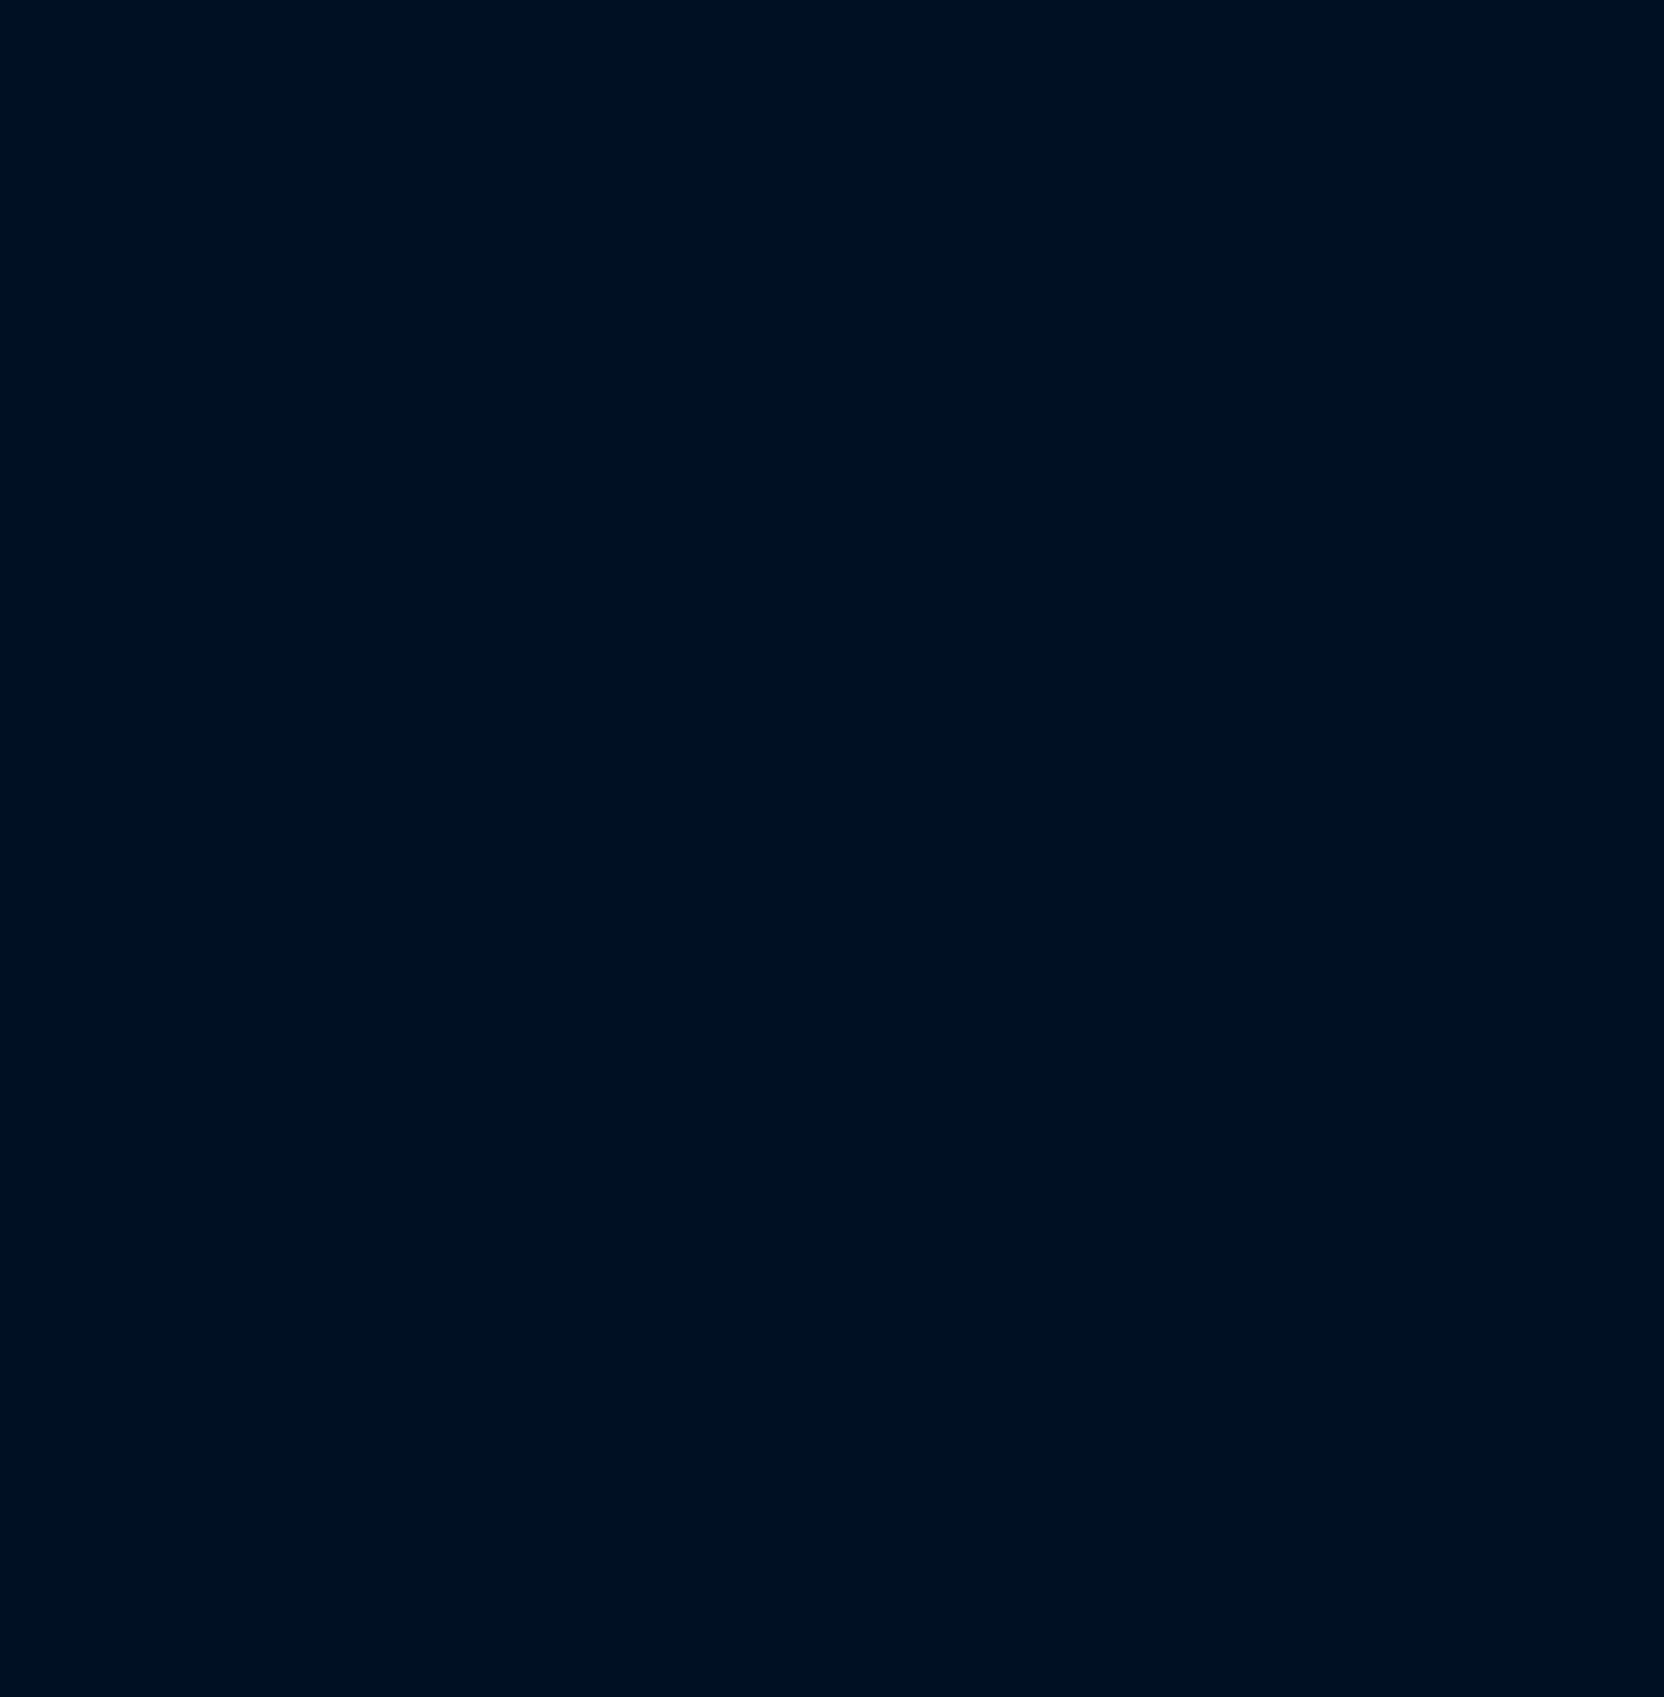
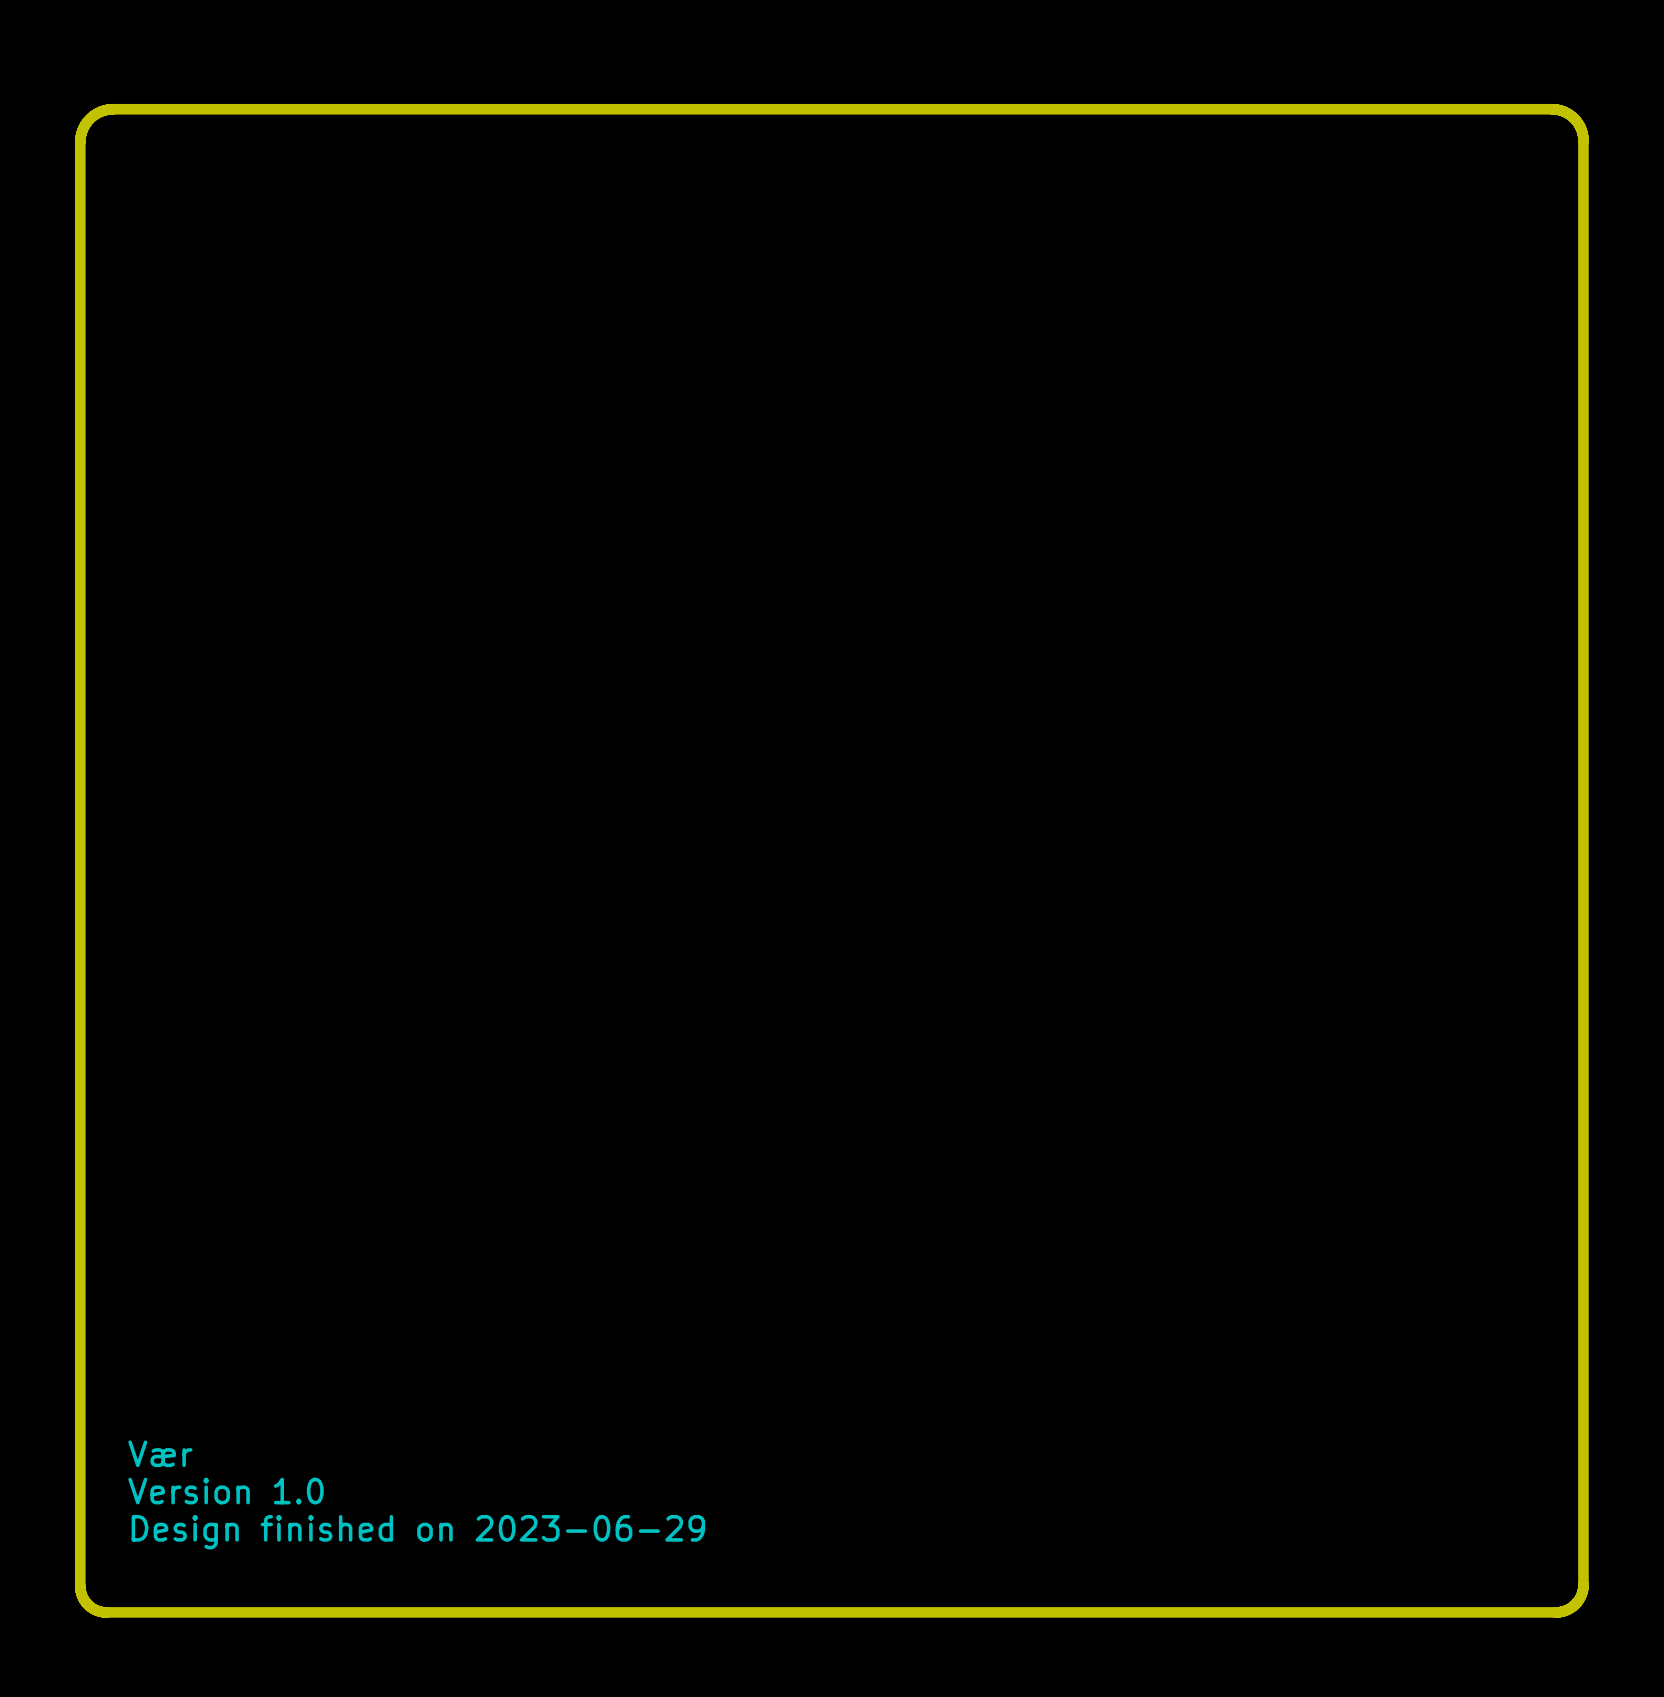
board edge: none -> (1553, 109) (113, 109) (100, 111) (89, 118) (82, 129) (80, 142) (80, 1586) (82, 1596) (87, 1604) (96, 1610) (106, 1612) (1555, 1612) (1566, 1610) (1575, 1604) (1581, 1595) (1583, 1584) (1583, 140) (1581, 130) (1575, 119) (1565, 112) (1553, 109)
text: none -> Vær (160, 1453)
text: none -> Version 1.0 (226, 1491)
text: none -> Design finished on 2023-06-29 (418, 1532)

